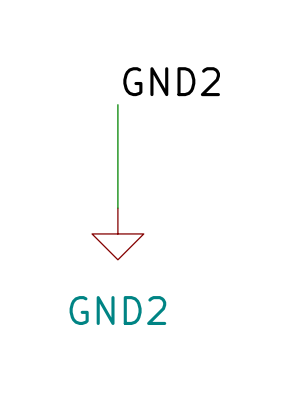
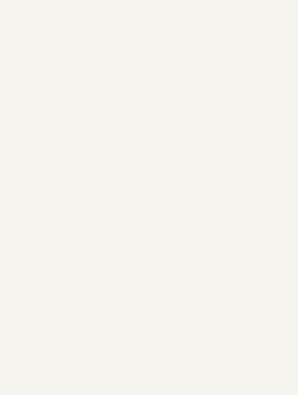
label: GND2 (171, 81) -> none
wire: (117, 104) (117, 208) -> none
power symbol: GND2 (117, 233) -> none

